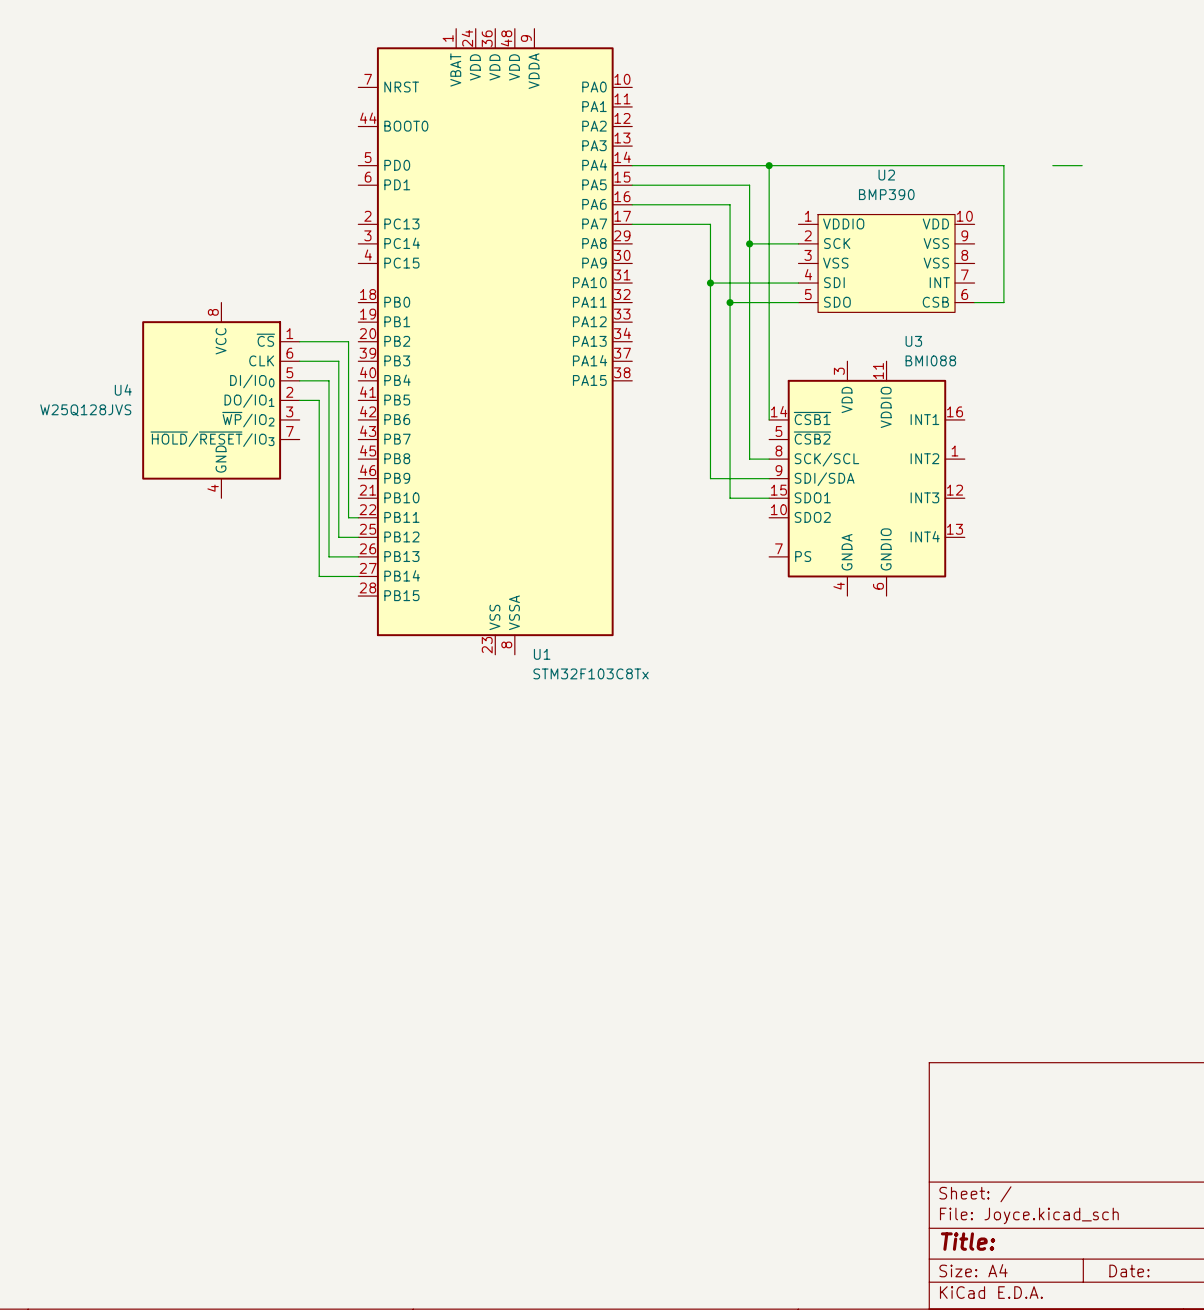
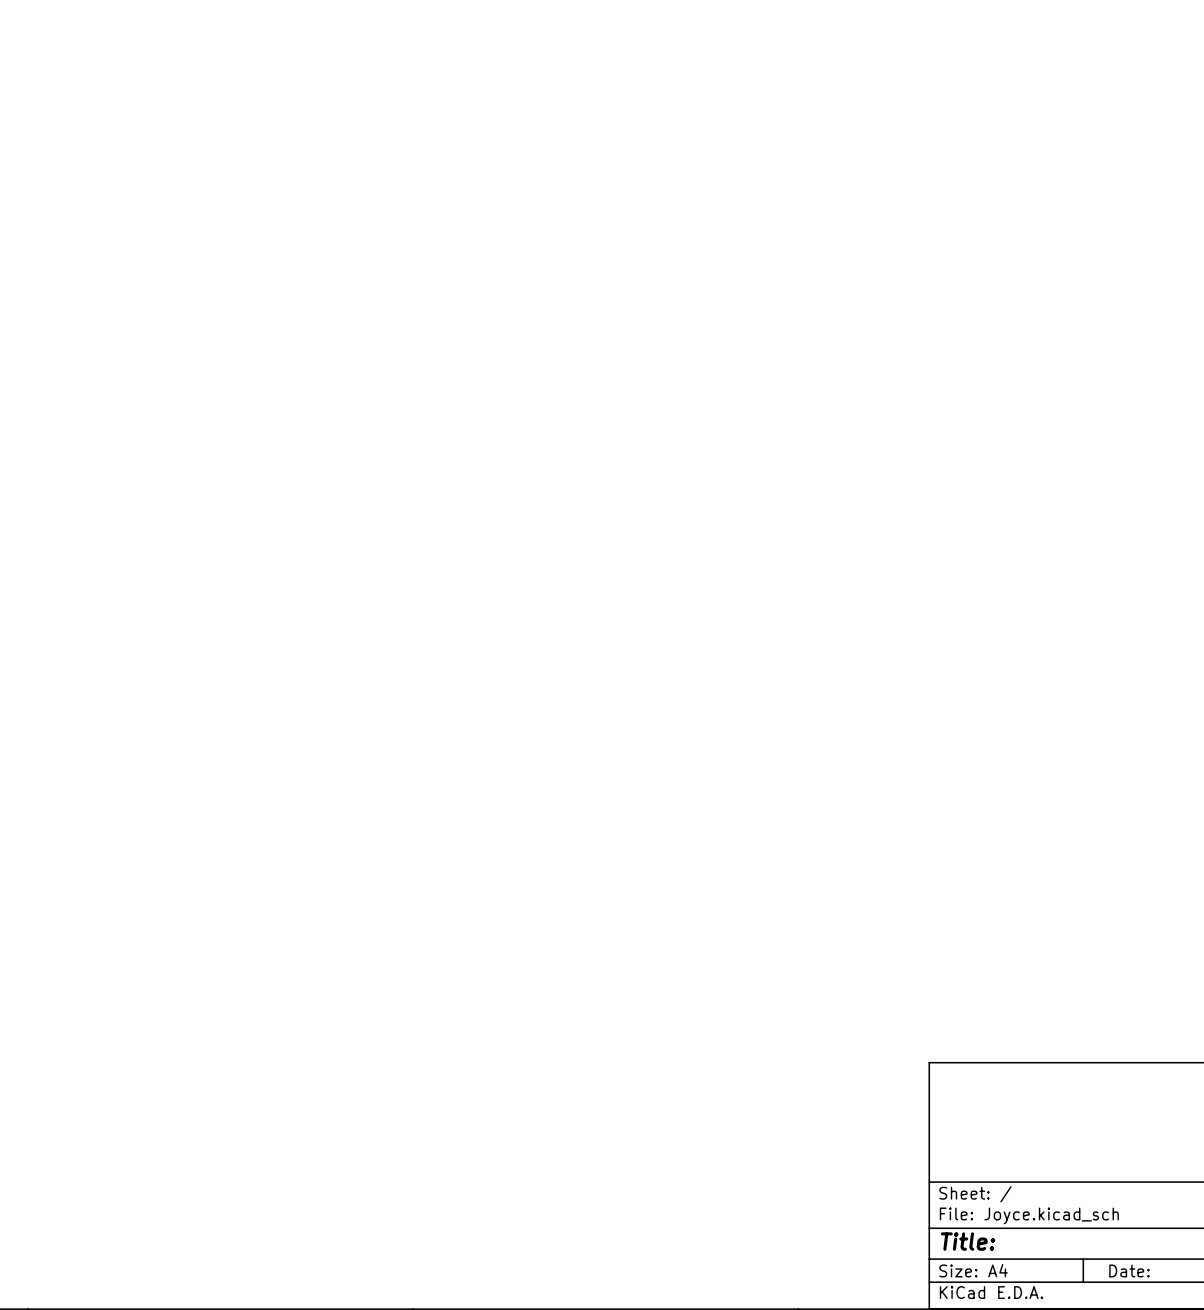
wire: (632, 165) (1003, 165) (1003, 302) (974, 302) -> none
wire: (769, 165) (769, 419) -> none
junction: (769, 165) -> none
wire: (1052, 165) (1082, 165) -> none
wire: (632, 185) (749, 185) (749, 459) (769, 459) -> none
wire: (632, 204) (730, 204) (730, 498) (769, 498) -> none
wire: (632, 224) (710, 224) (710, 478) (769, 478) -> none
wire: (749, 243) (798, 243) -> none
junction: (749, 243) -> none
U2: BMP390 (886, 263) -> none
wire: (710, 283) (798, 283) -> none
junction: (710, 283) -> none
wire: (730, 302) (798, 302) -> none
junction: (730, 302) -> none
wire: (299, 341) (348, 341) (348, 517) (358, 517) -> none
U1: STM32F103C8Tx (495, 341) -> none
wire: (299, 361) (338, 361) (338, 537) (358, 537) -> none
wire: (299, 380) (329, 380) (329, 556) (358, 556) -> none
U4: W25Q128JVS (220, 400) -> none
wire: (299, 400) (319, 400) (319, 576) (358, 576) -> none
U3: BMI088 (866, 478) -> none

